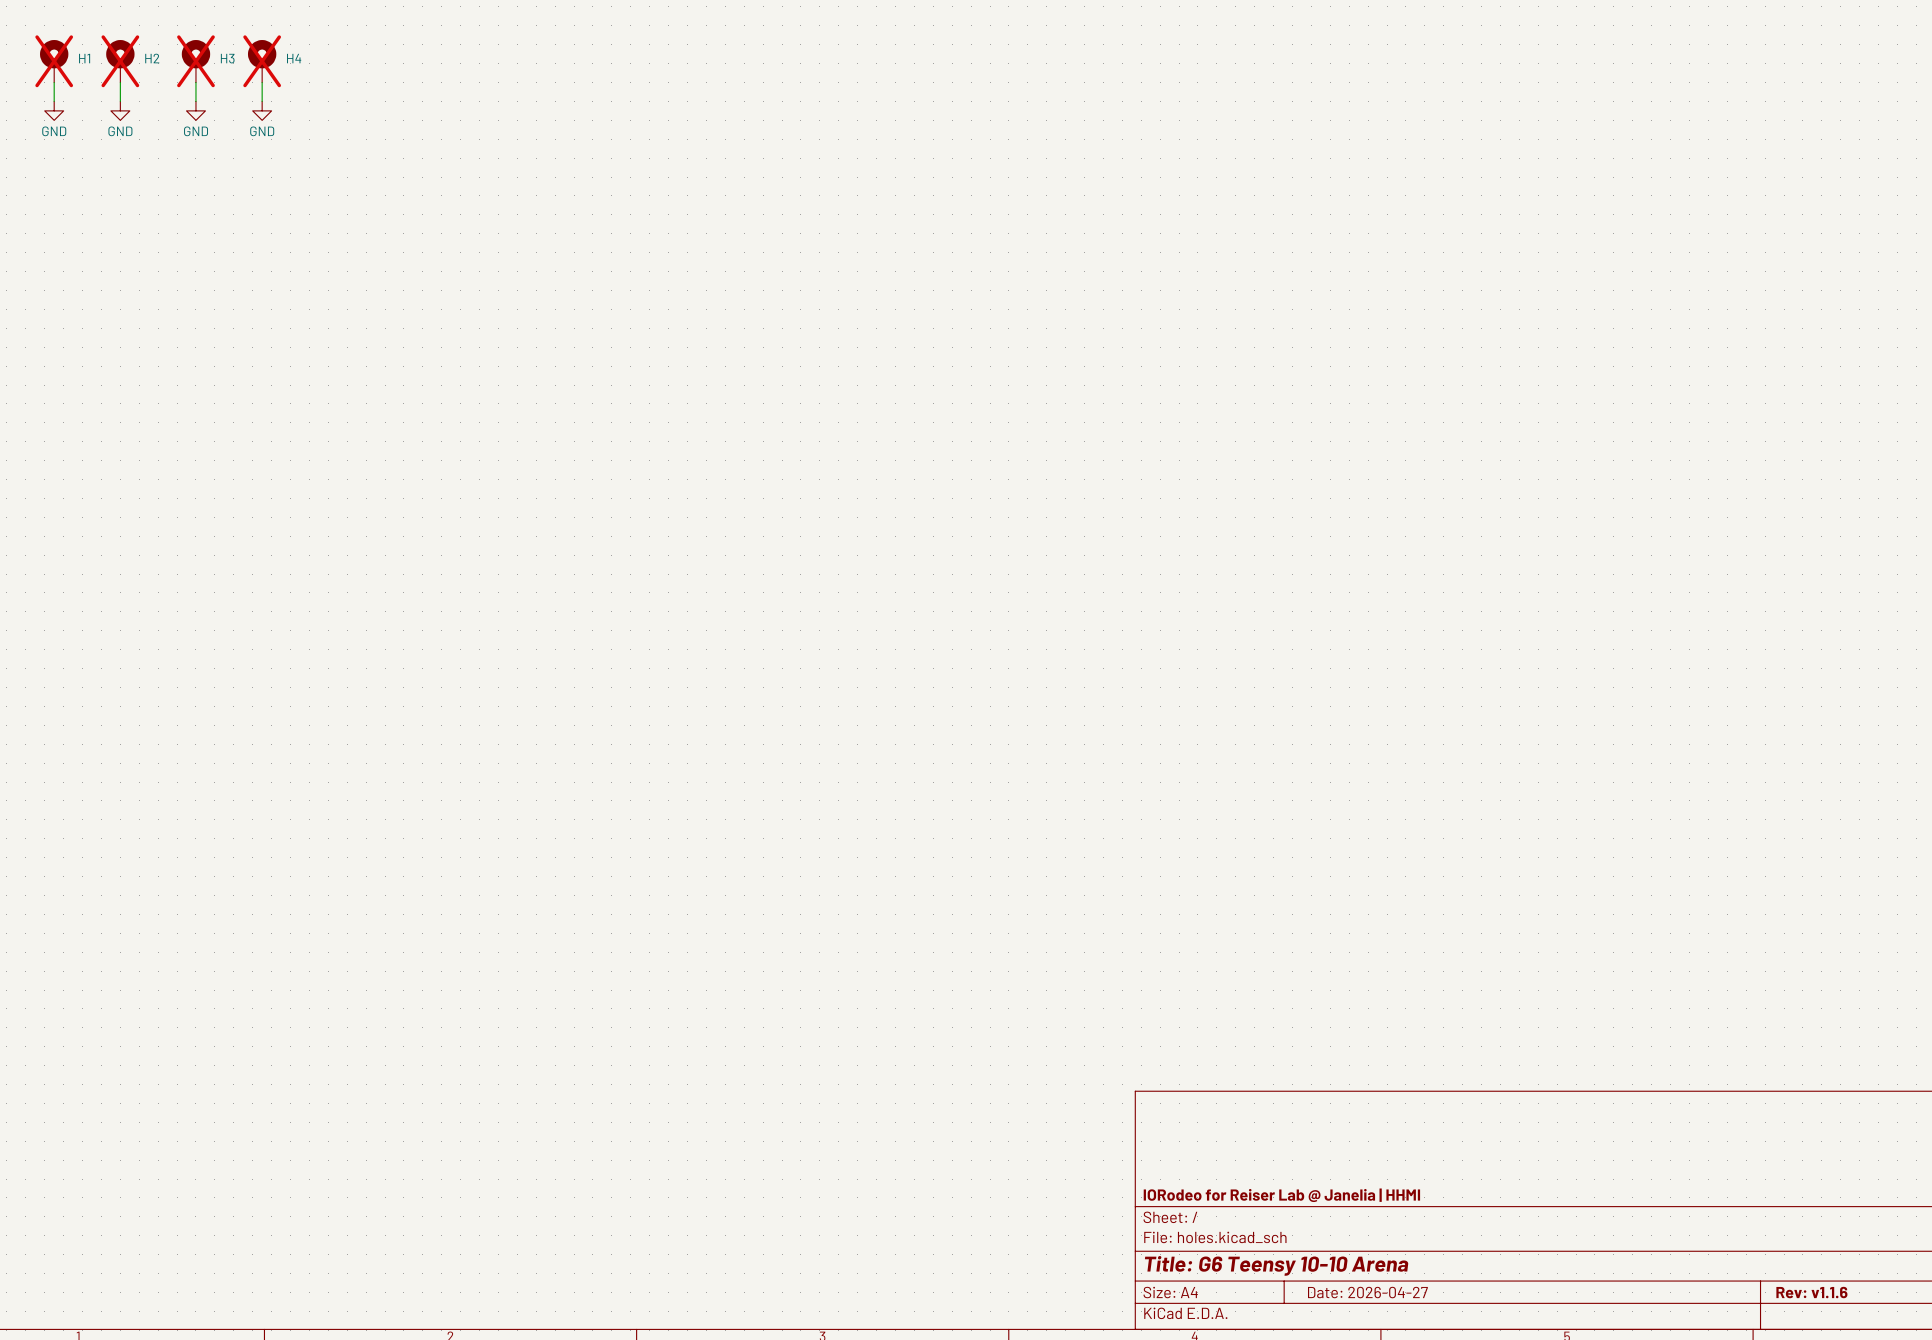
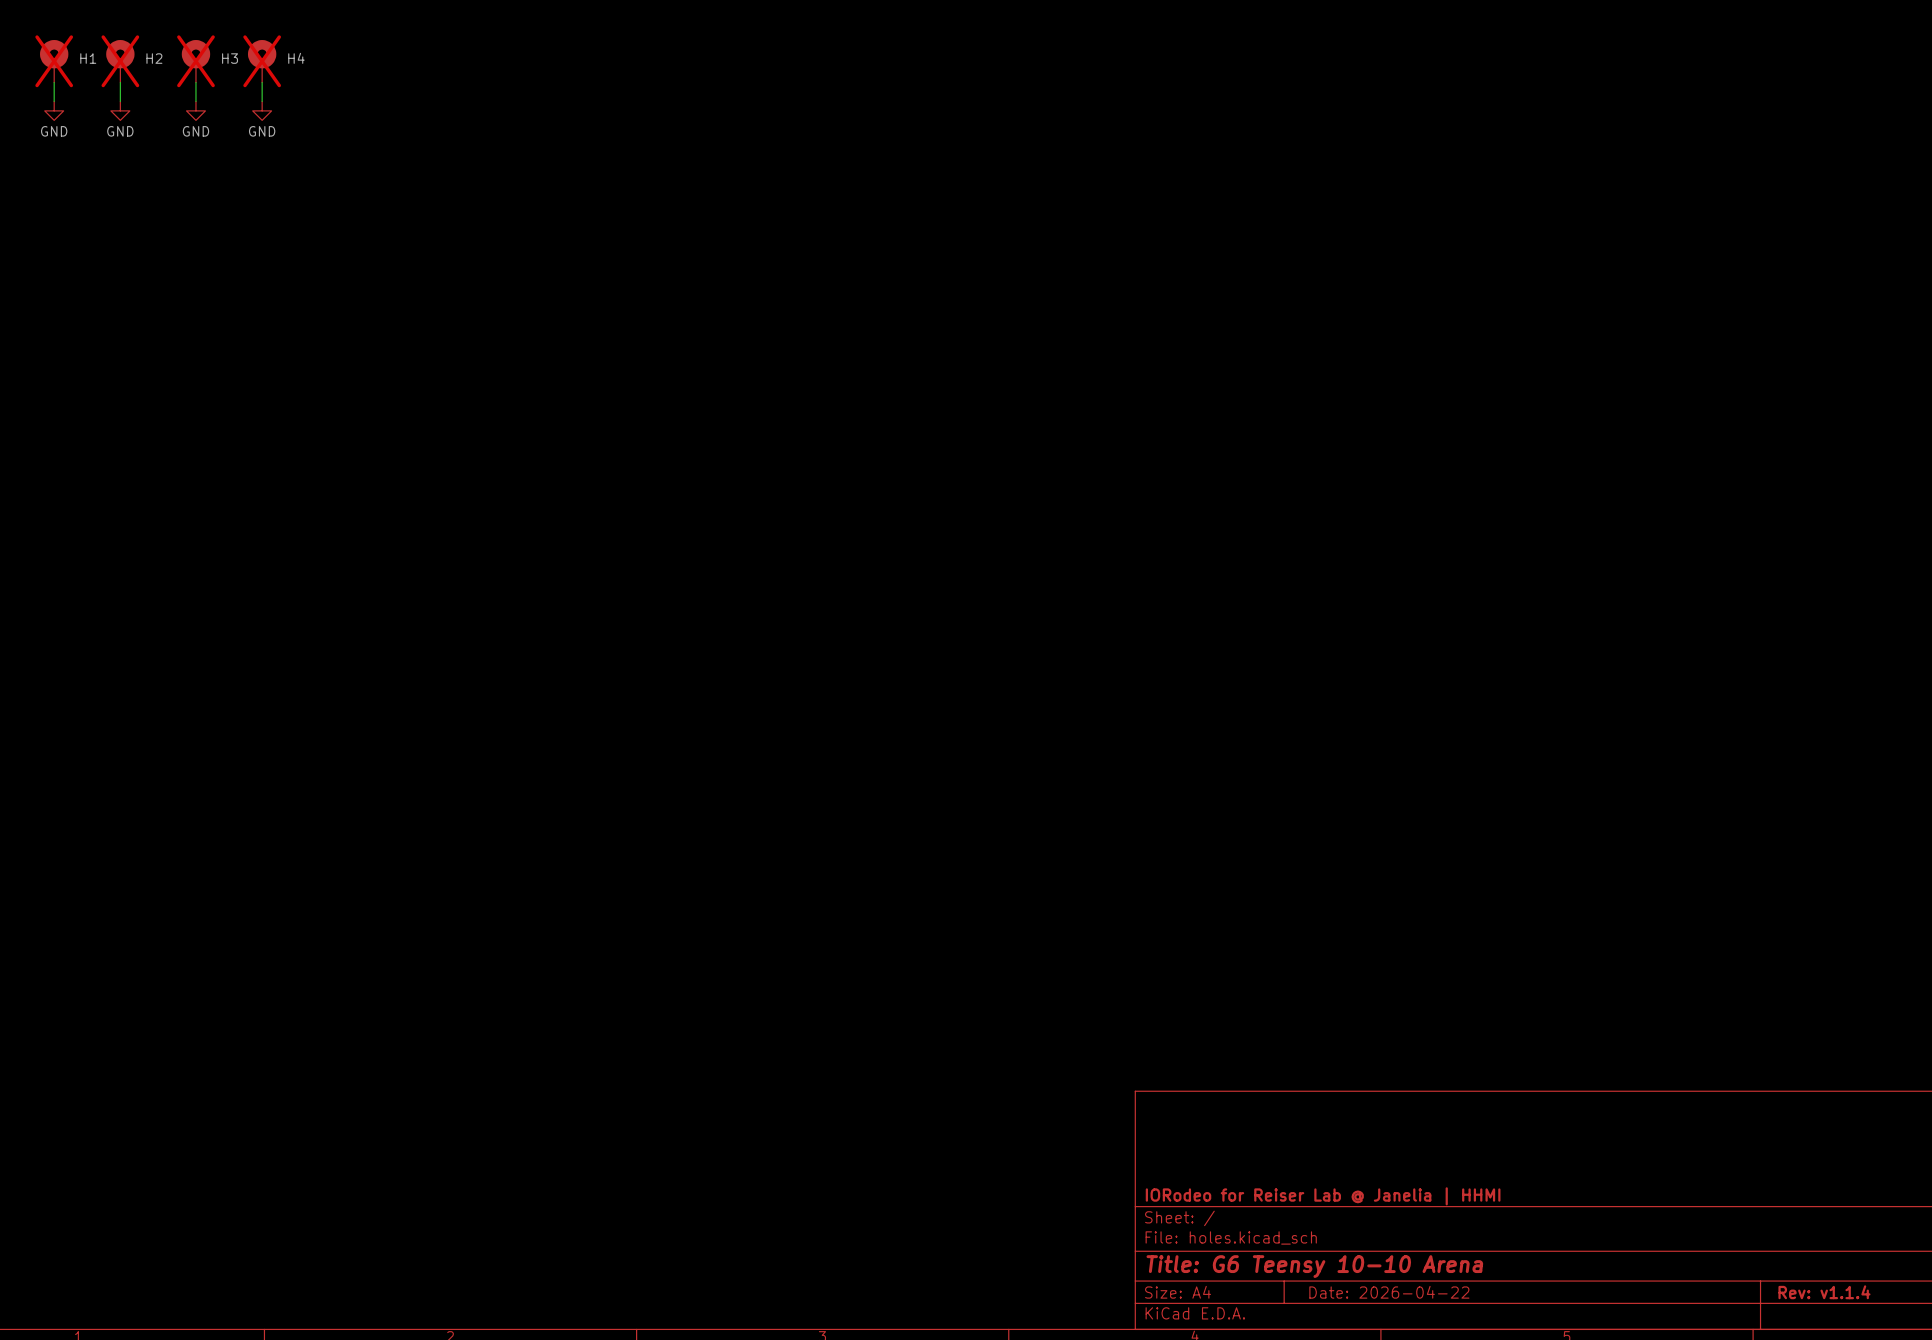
title block: Date: 2026-04-27 (1367, 1292) -> Date: 2026-04-22 (1389, 1292)
title block: Rev: v1.1.6 (1811, 1292) -> Rev: v1.1.4 (1824, 1292)

